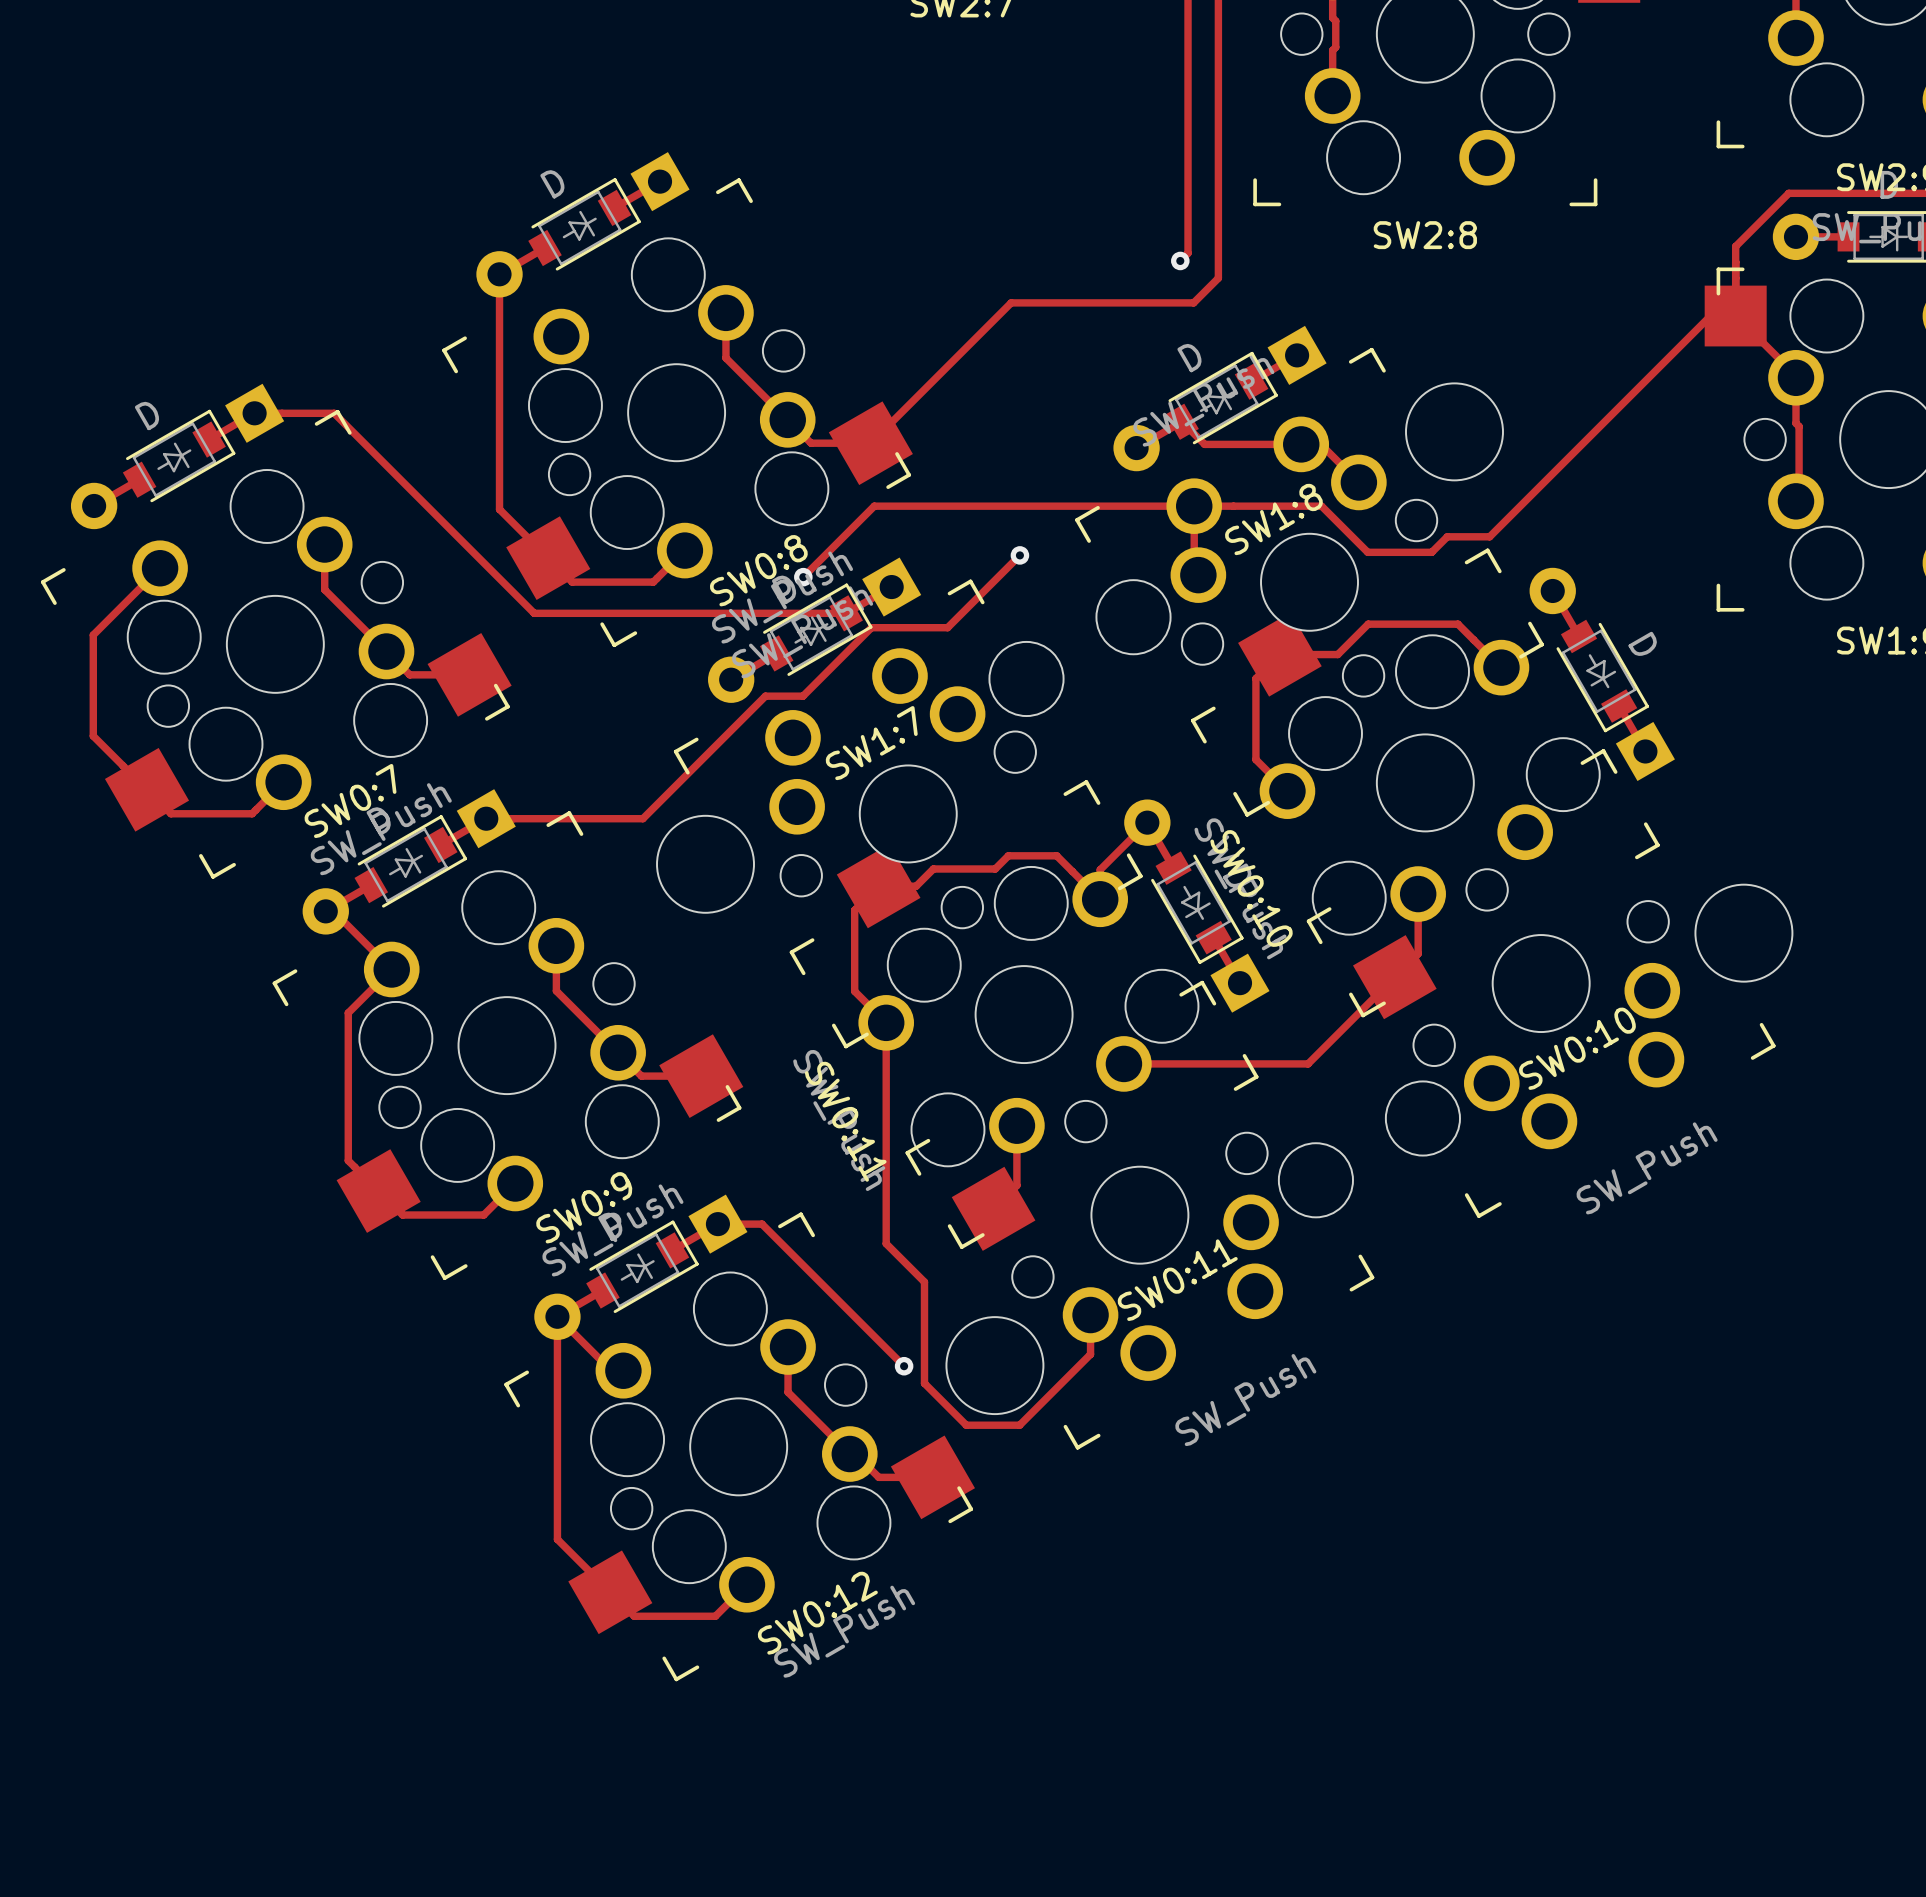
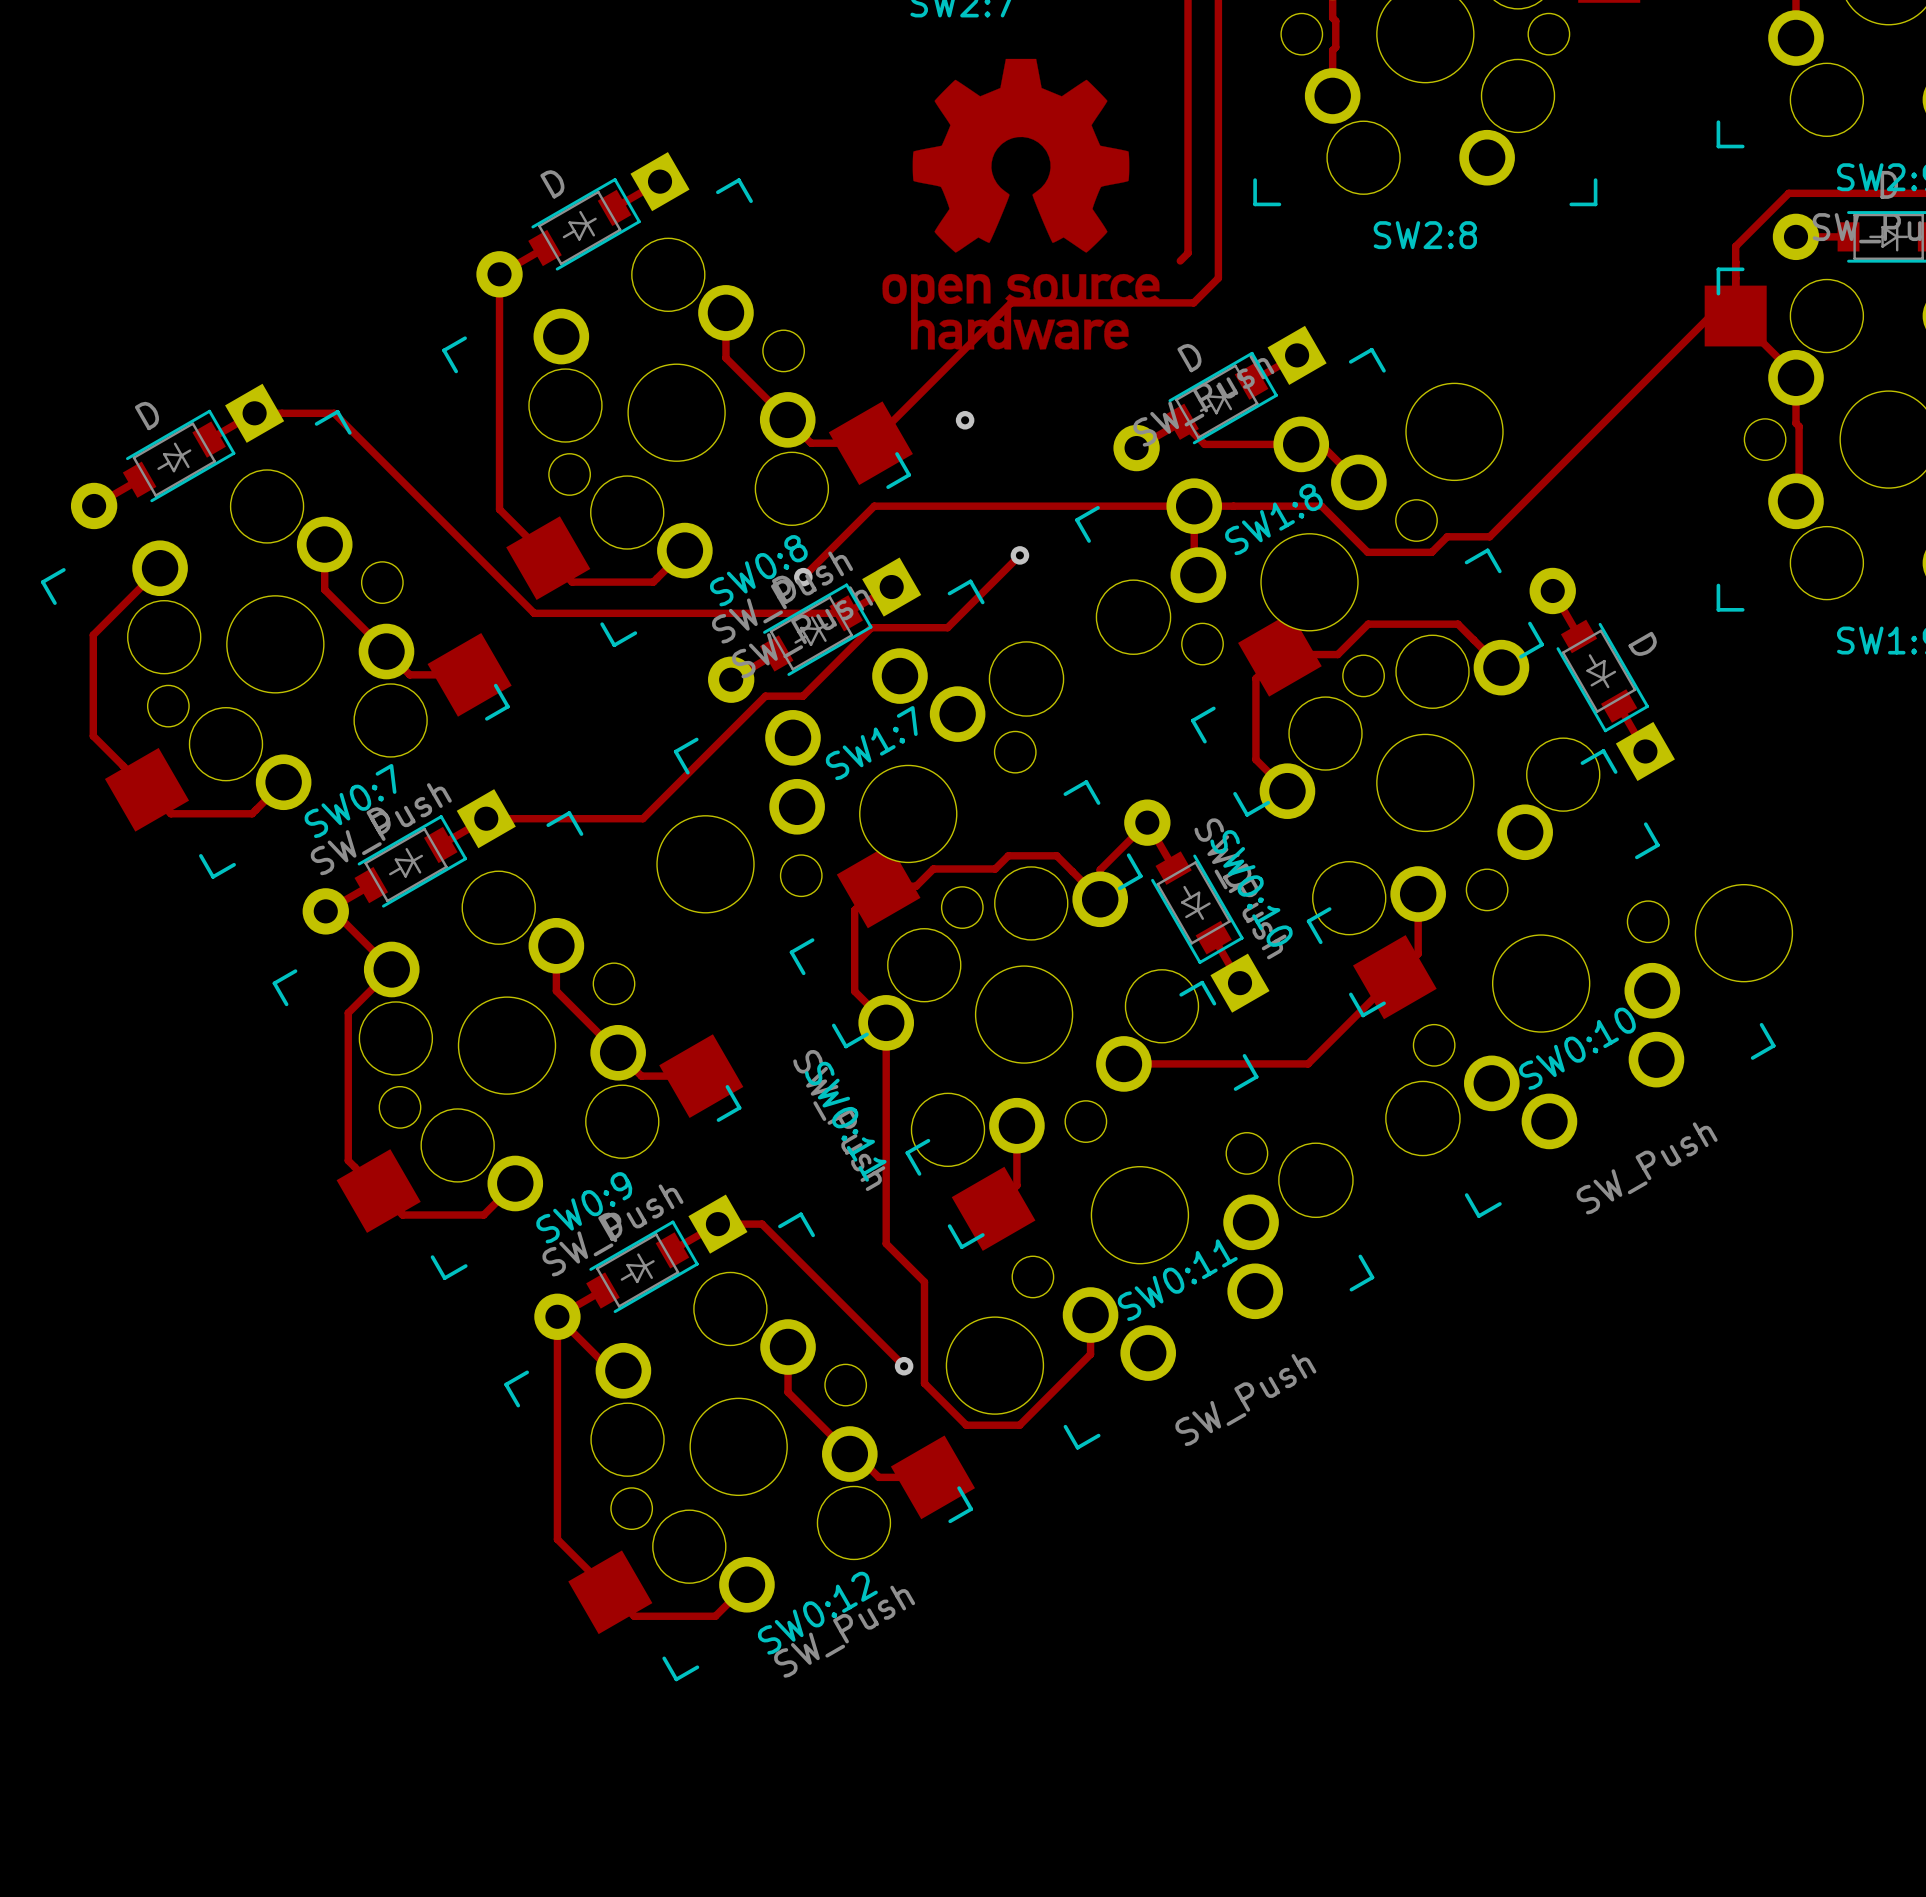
drawing: none -> [882, 58, 1160, 350]
via: (1180, 260) -> none
via: none -> (965, 420)

